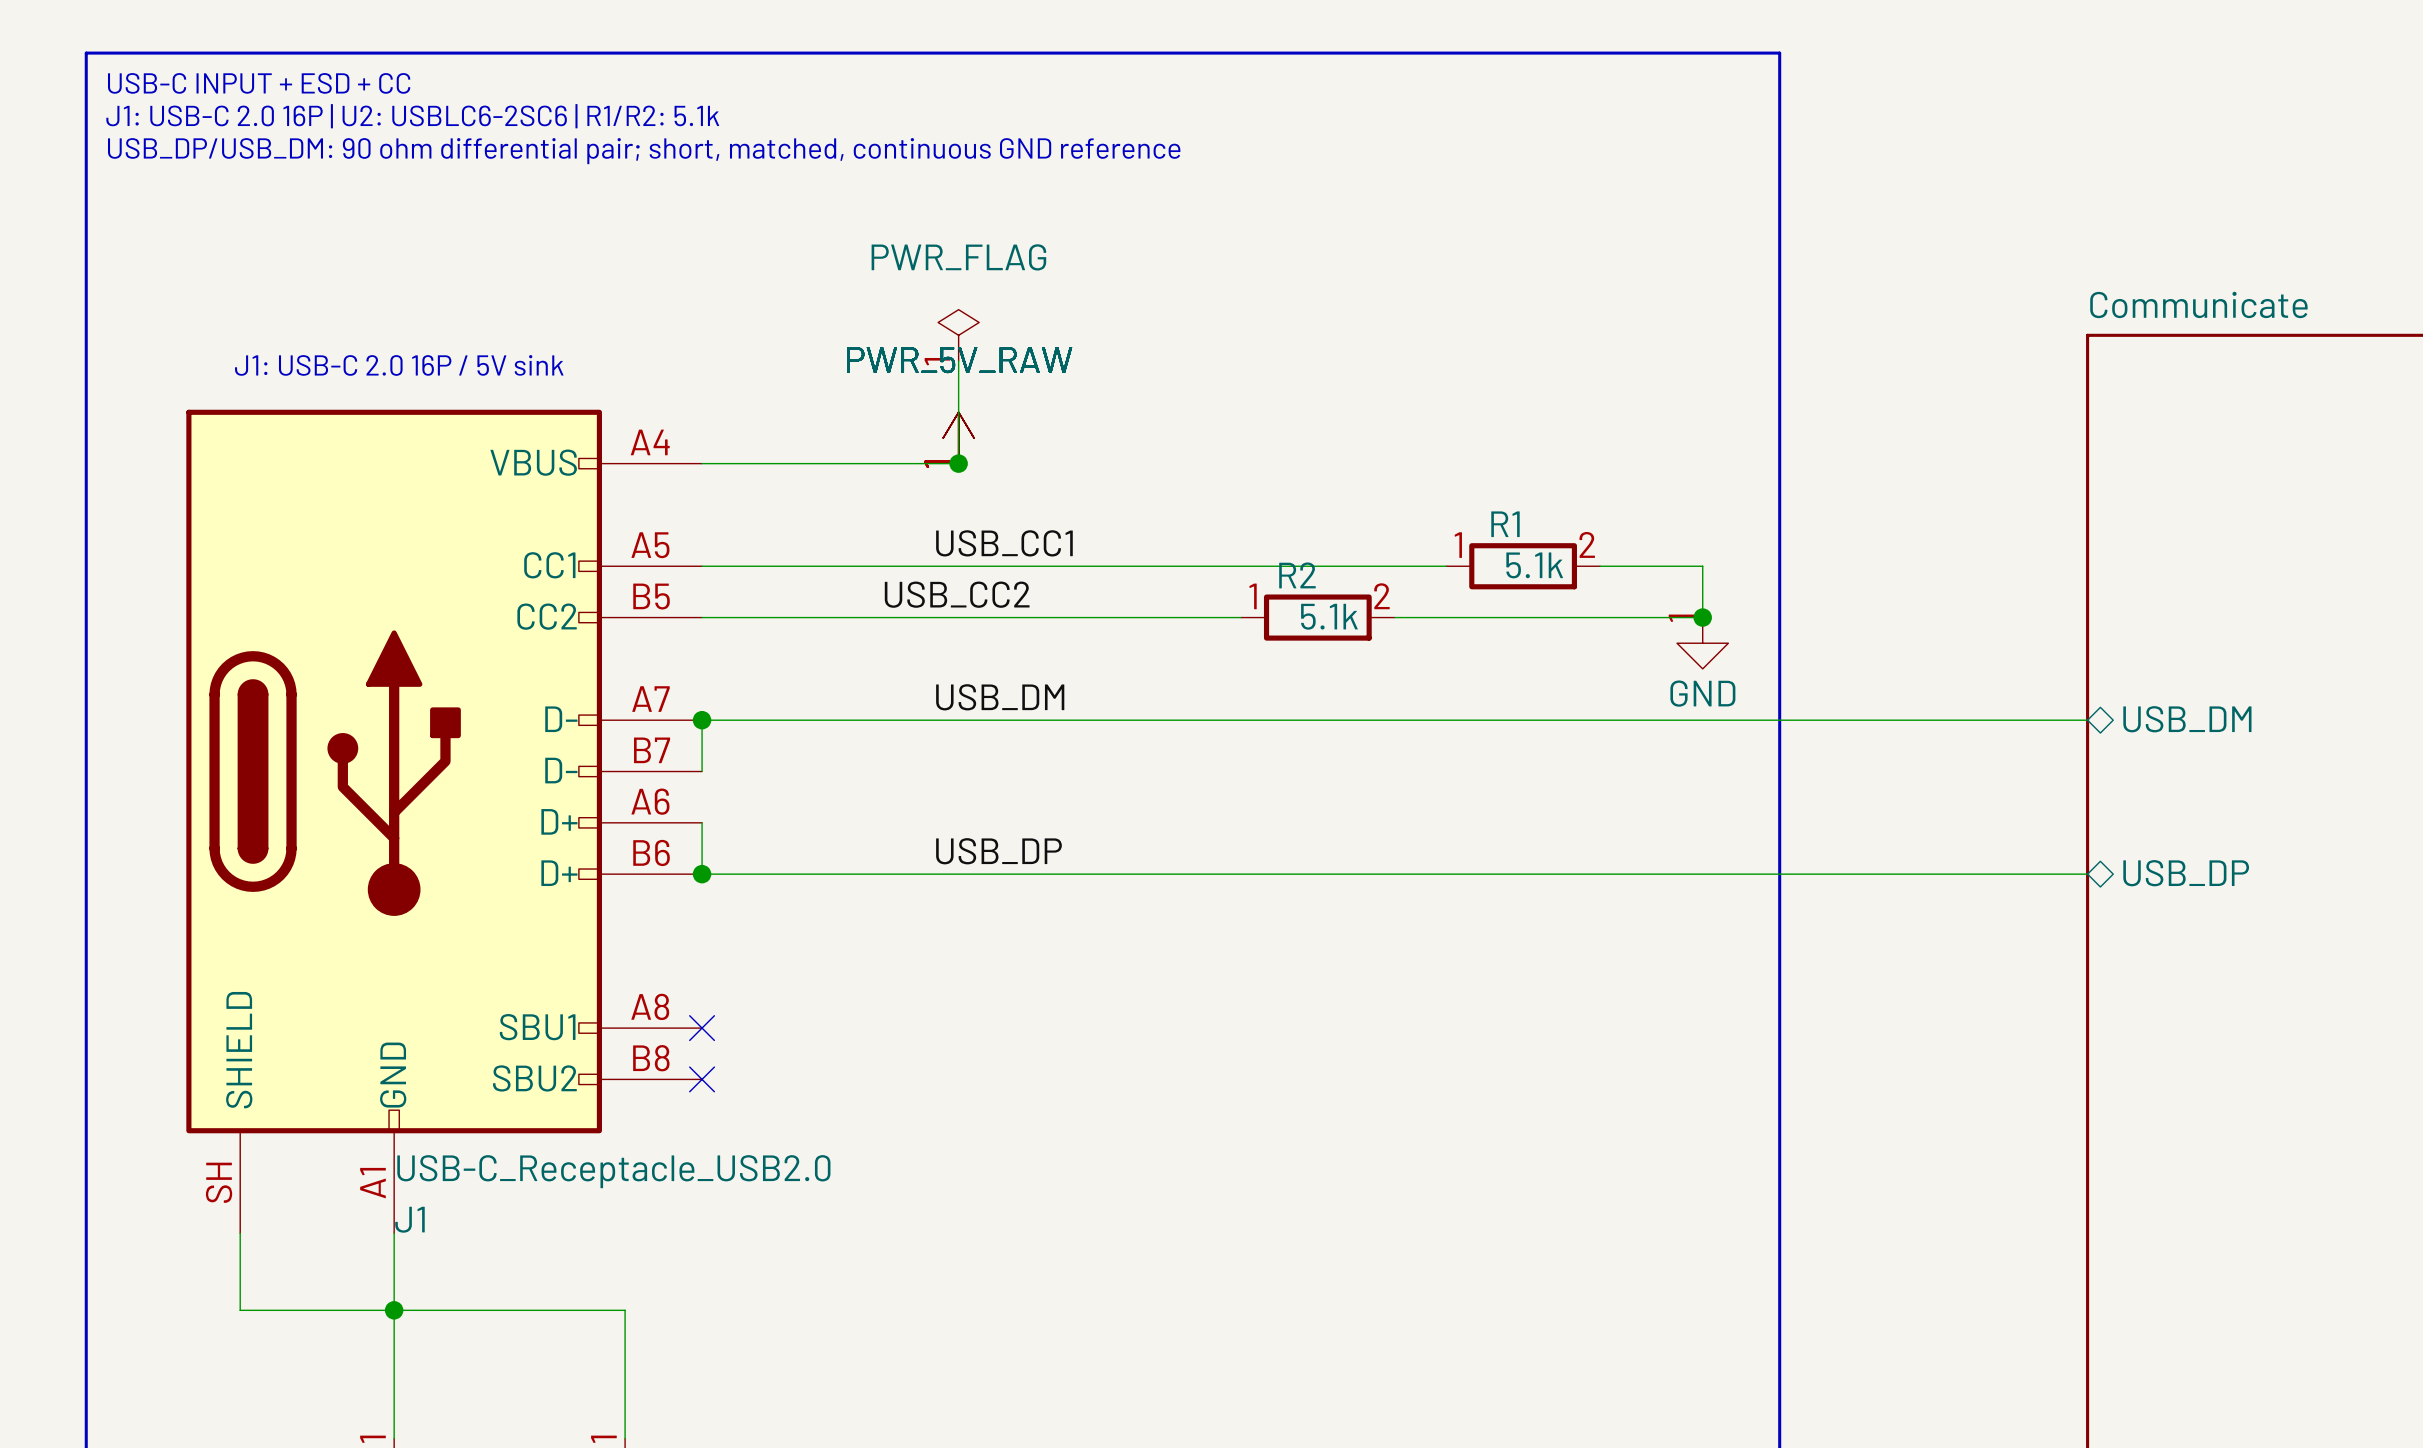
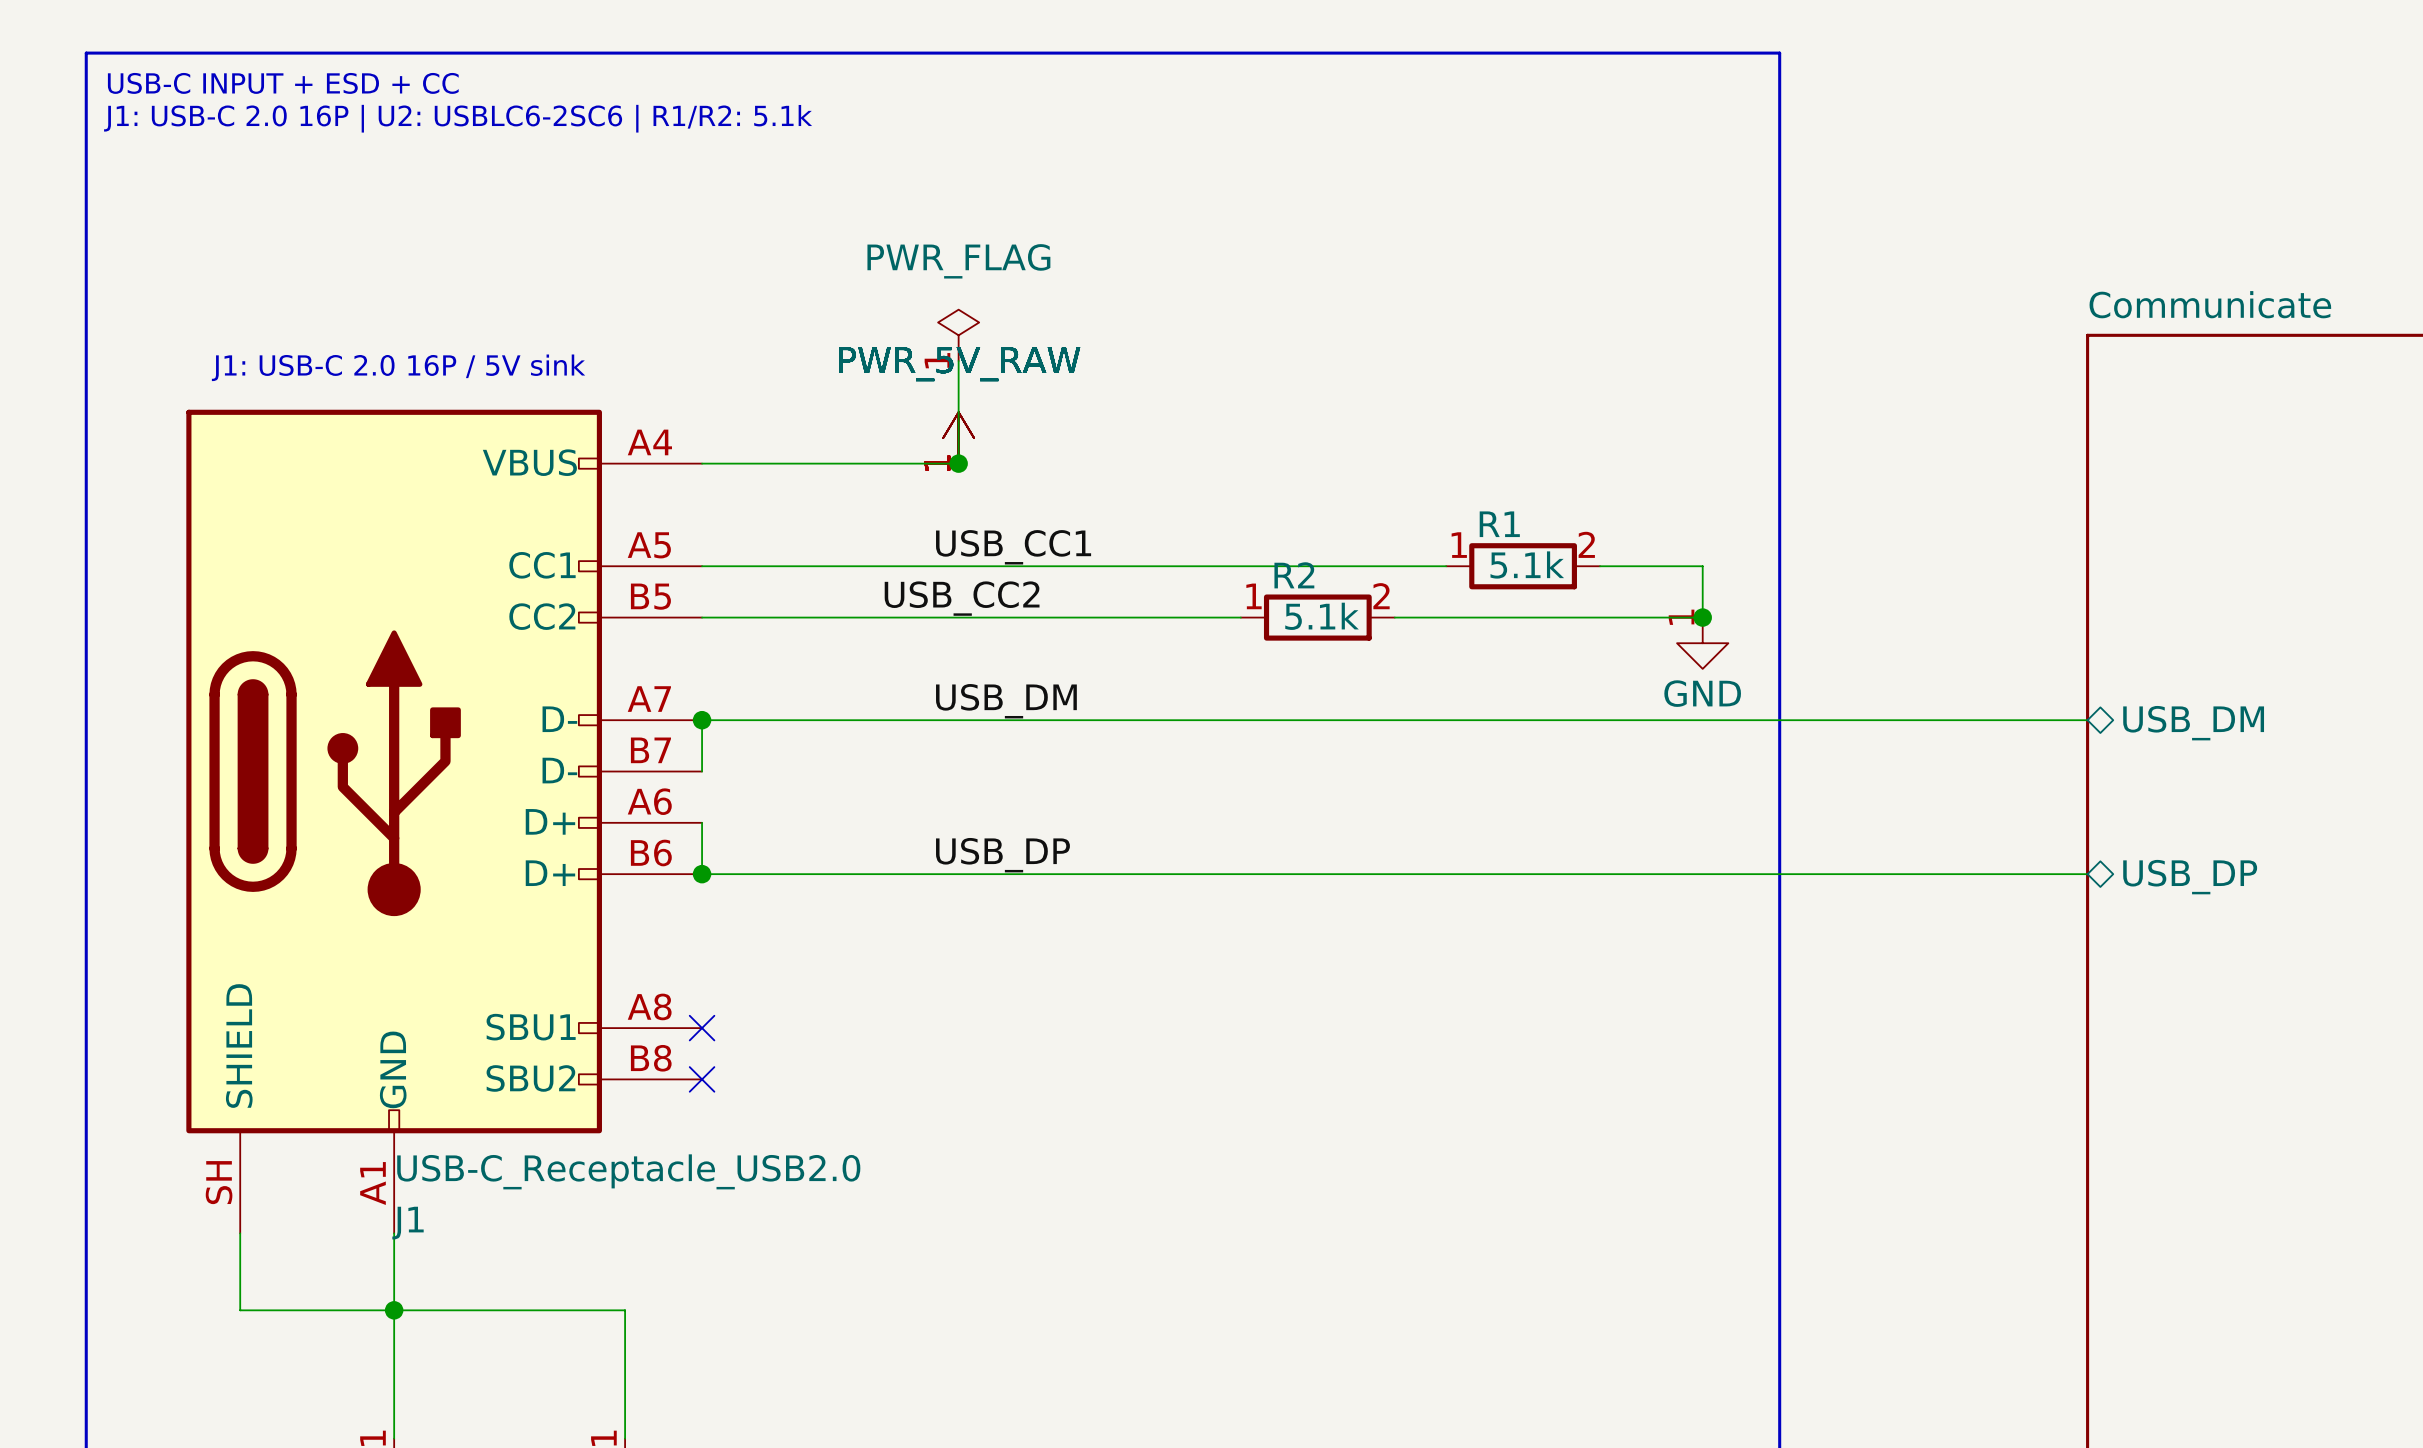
text: USB_DP/USB_DM: 90 ohm differential pair; short, matched, continuous GND reference (644, 151) -> none

